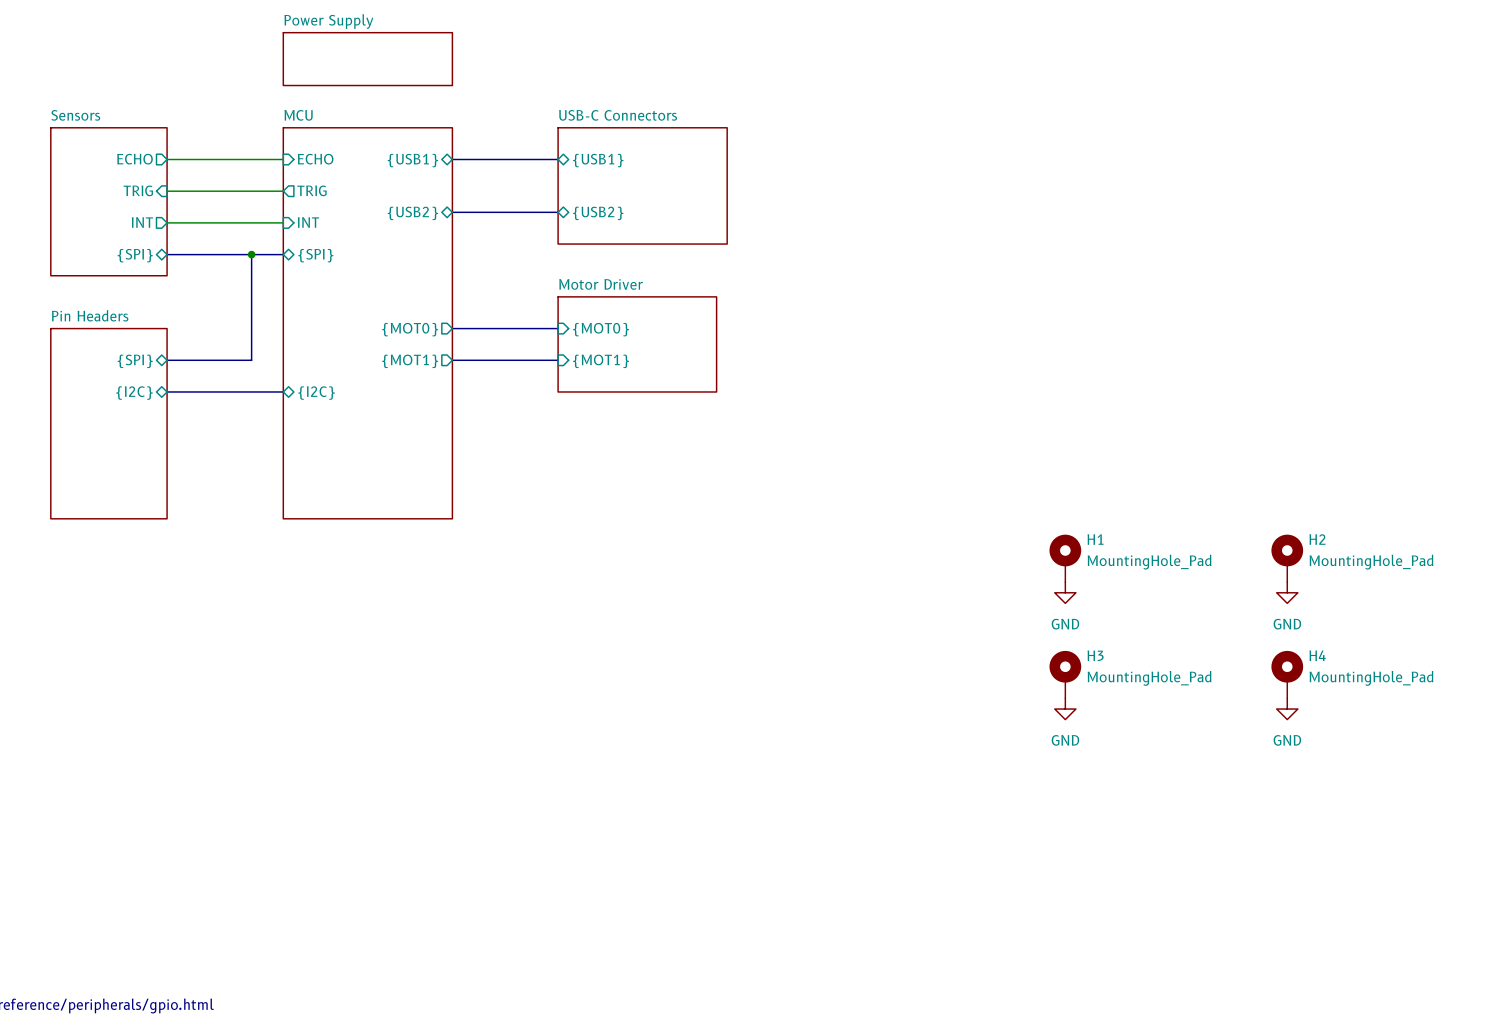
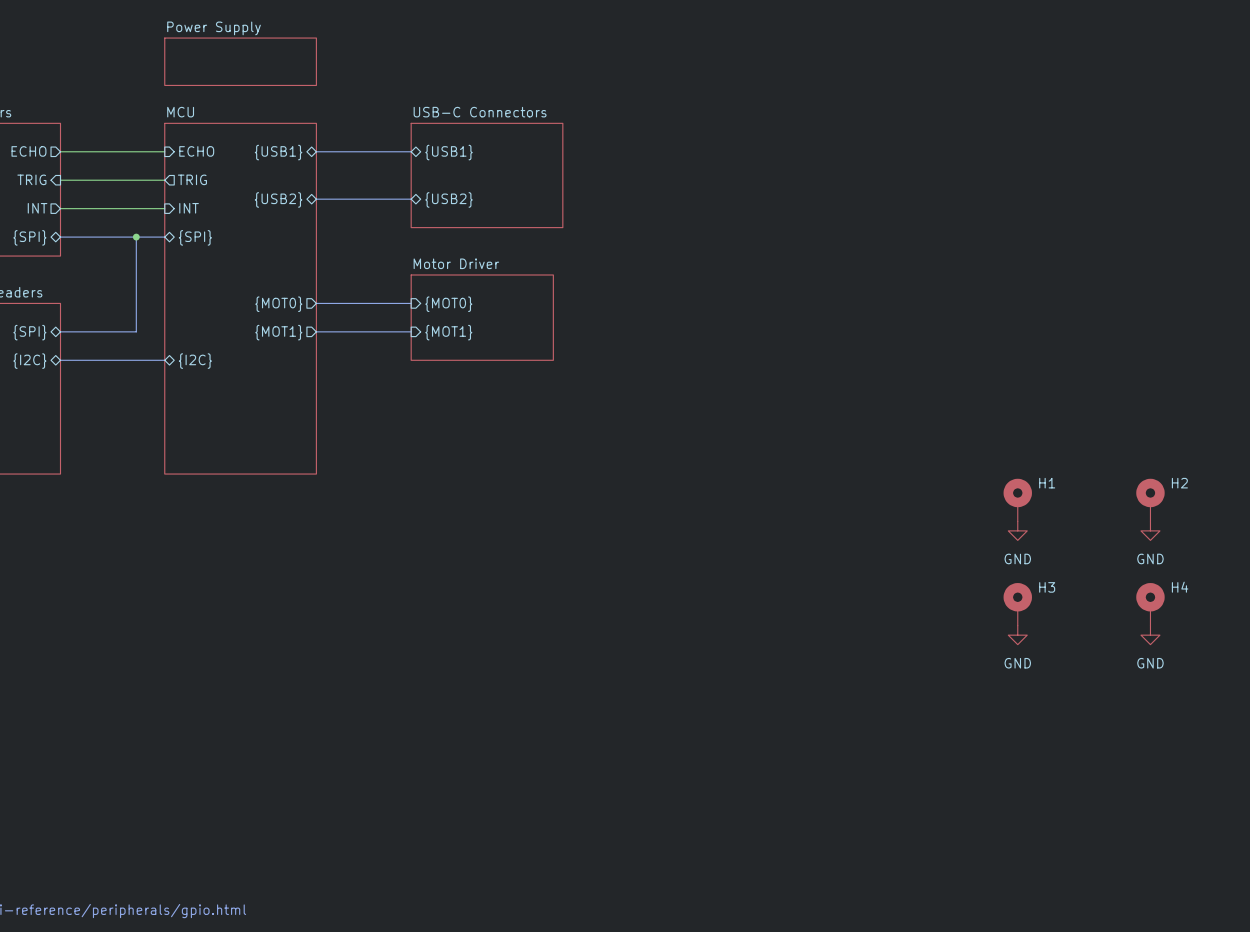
H1 position: (1065, 558) -> (1017, 500)
H2 position: (1287, 558) -> (1150, 500)
H1 value: MountingHole_Pad (1149, 562) -> none
H2 value: MountingHole_Pad (1371, 562) -> none
power symbol: none -> GND (1017, 530)
power symbol: none -> GND (1150, 530)
power symbol: GND (1065, 592) -> none
power symbol: GND (1287, 592) -> none
H3 position: (1065, 674) -> (1017, 604)
H4 position: (1287, 674) -> (1150, 604)
H3 value: MountingHole_Pad (1149, 678) -> none
H4 value: MountingHole_Pad (1371, 678) -> none
power symbol: none -> GND (1017, 635)
power symbol: none -> GND (1150, 635)
power symbol: GND (1065, 709) -> none
power symbol: GND (1287, 709) -> none

